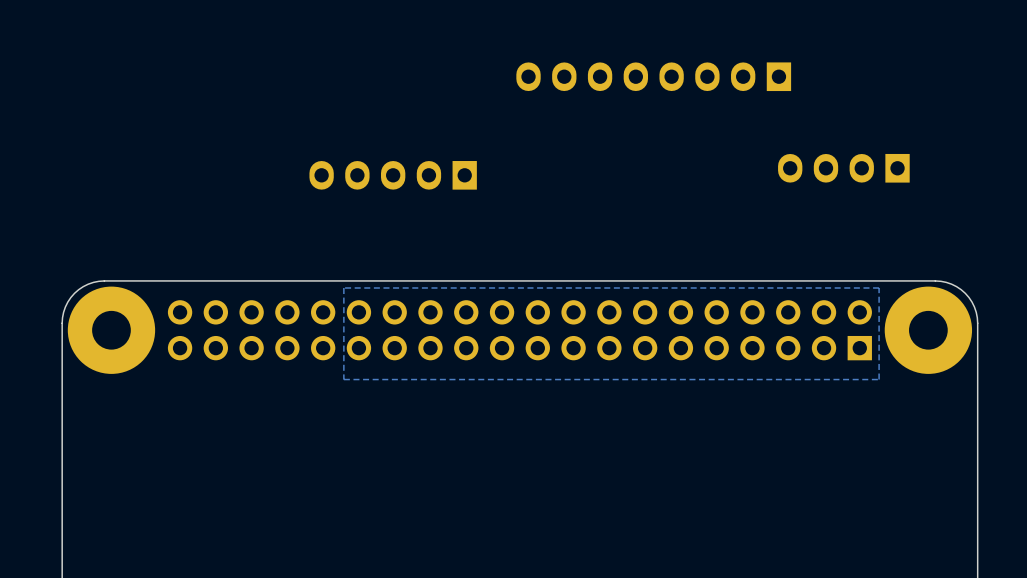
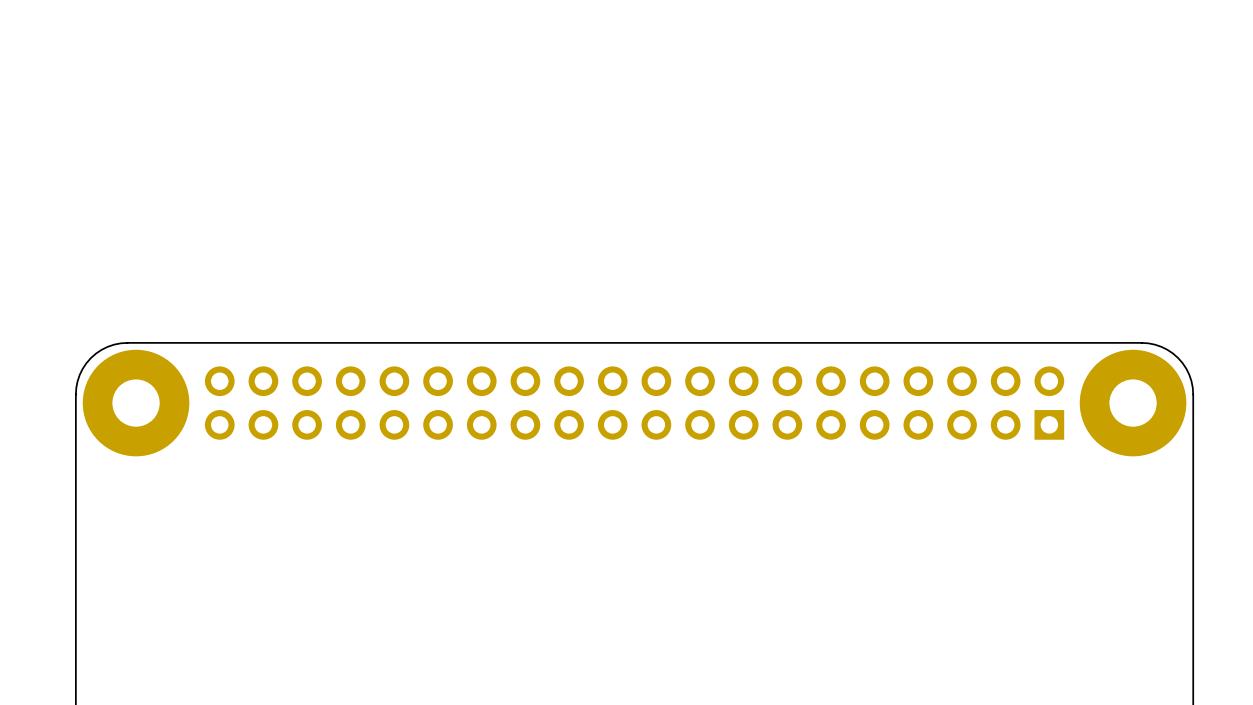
part: (653, 76) -> none
part: (843, 168) -> none
part: (393, 175) -> none
bottom zone outline: (879, 287) (879, 379) (343, 379) (343, 287) (879, 287) -> none

